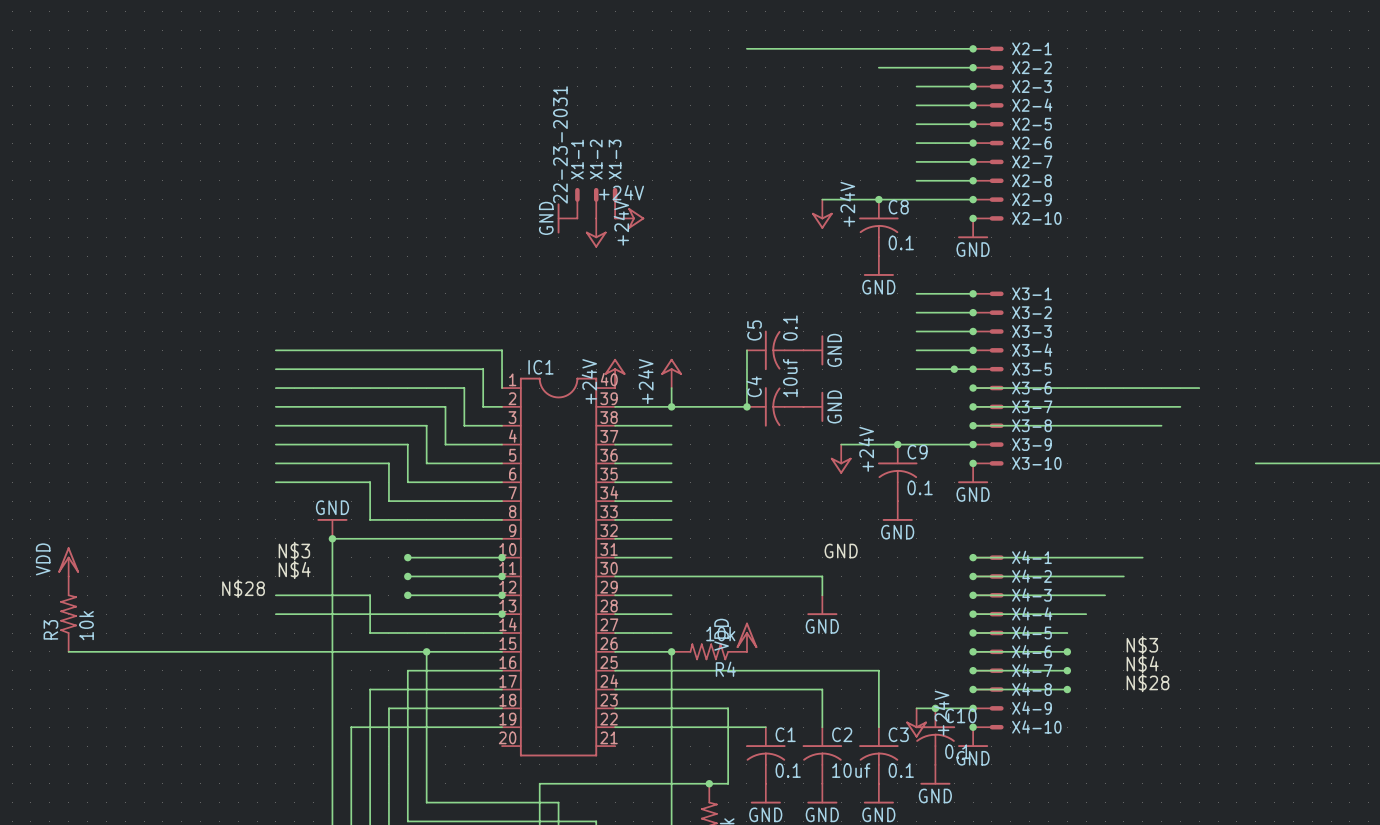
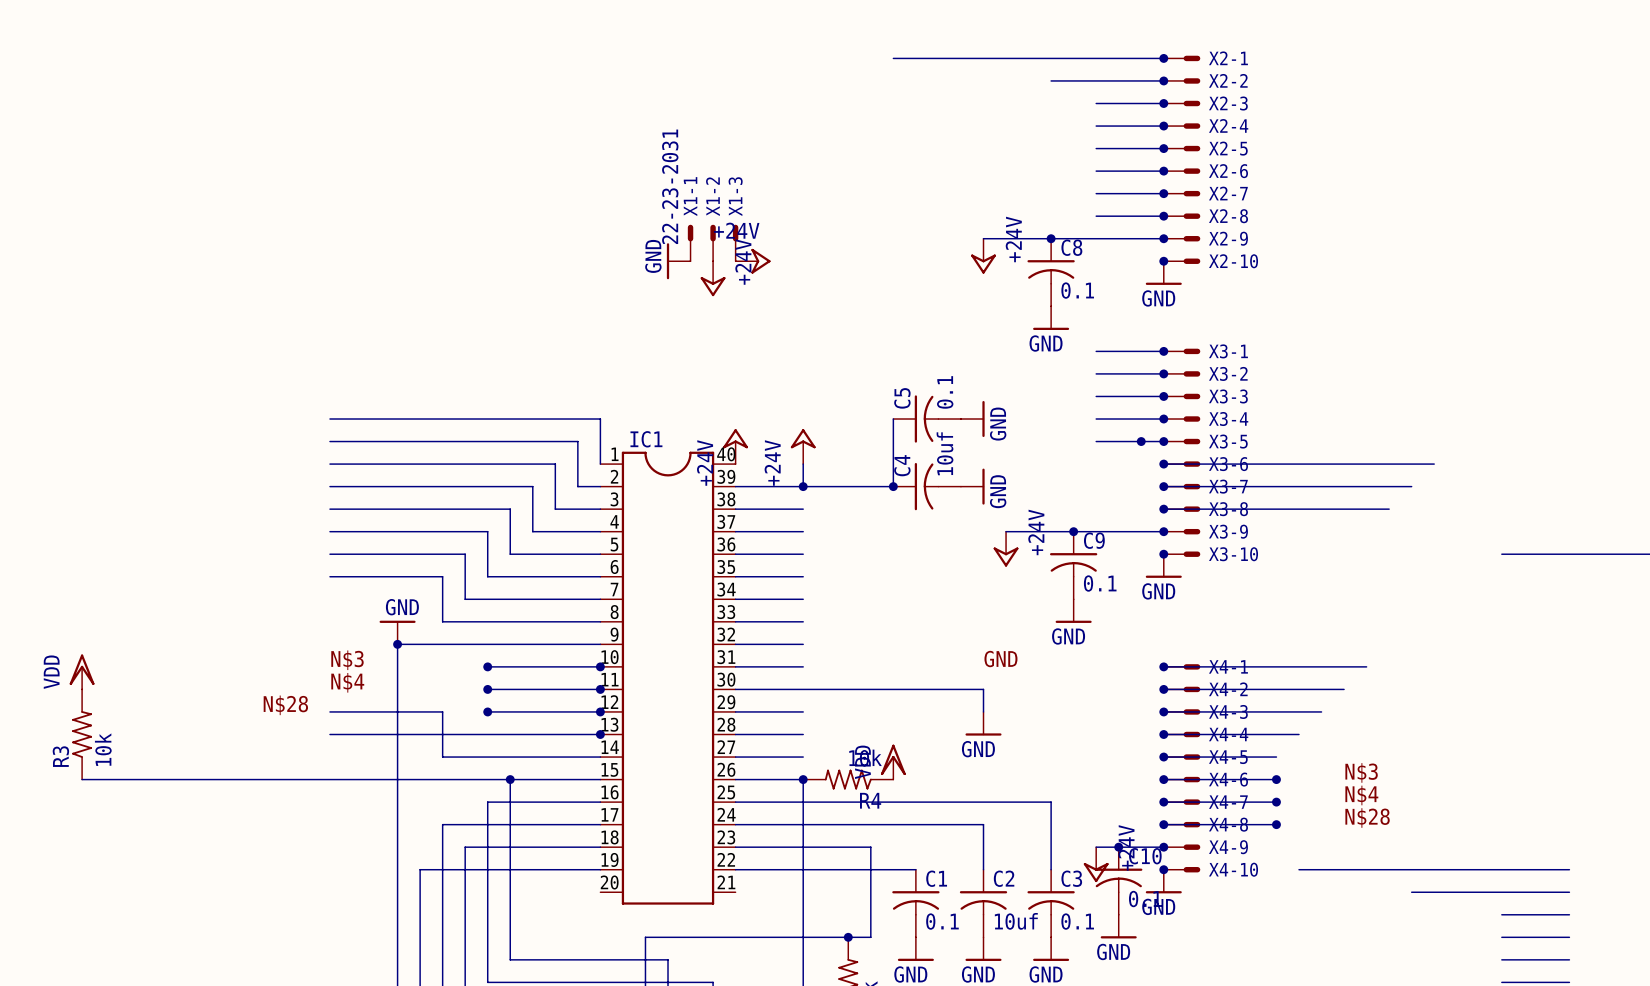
wire: none -> (1299, 869) (1569, 869)
wire: none -> (1411, 892) (1569, 892)
wire: none -> (1501, 914) (1569, 914)
wire: none -> (1501, 937) (1569, 937)
wire: none -> (1501, 959) (1569, 959)
wire: none -> (1501, 982) (1569, 982)

